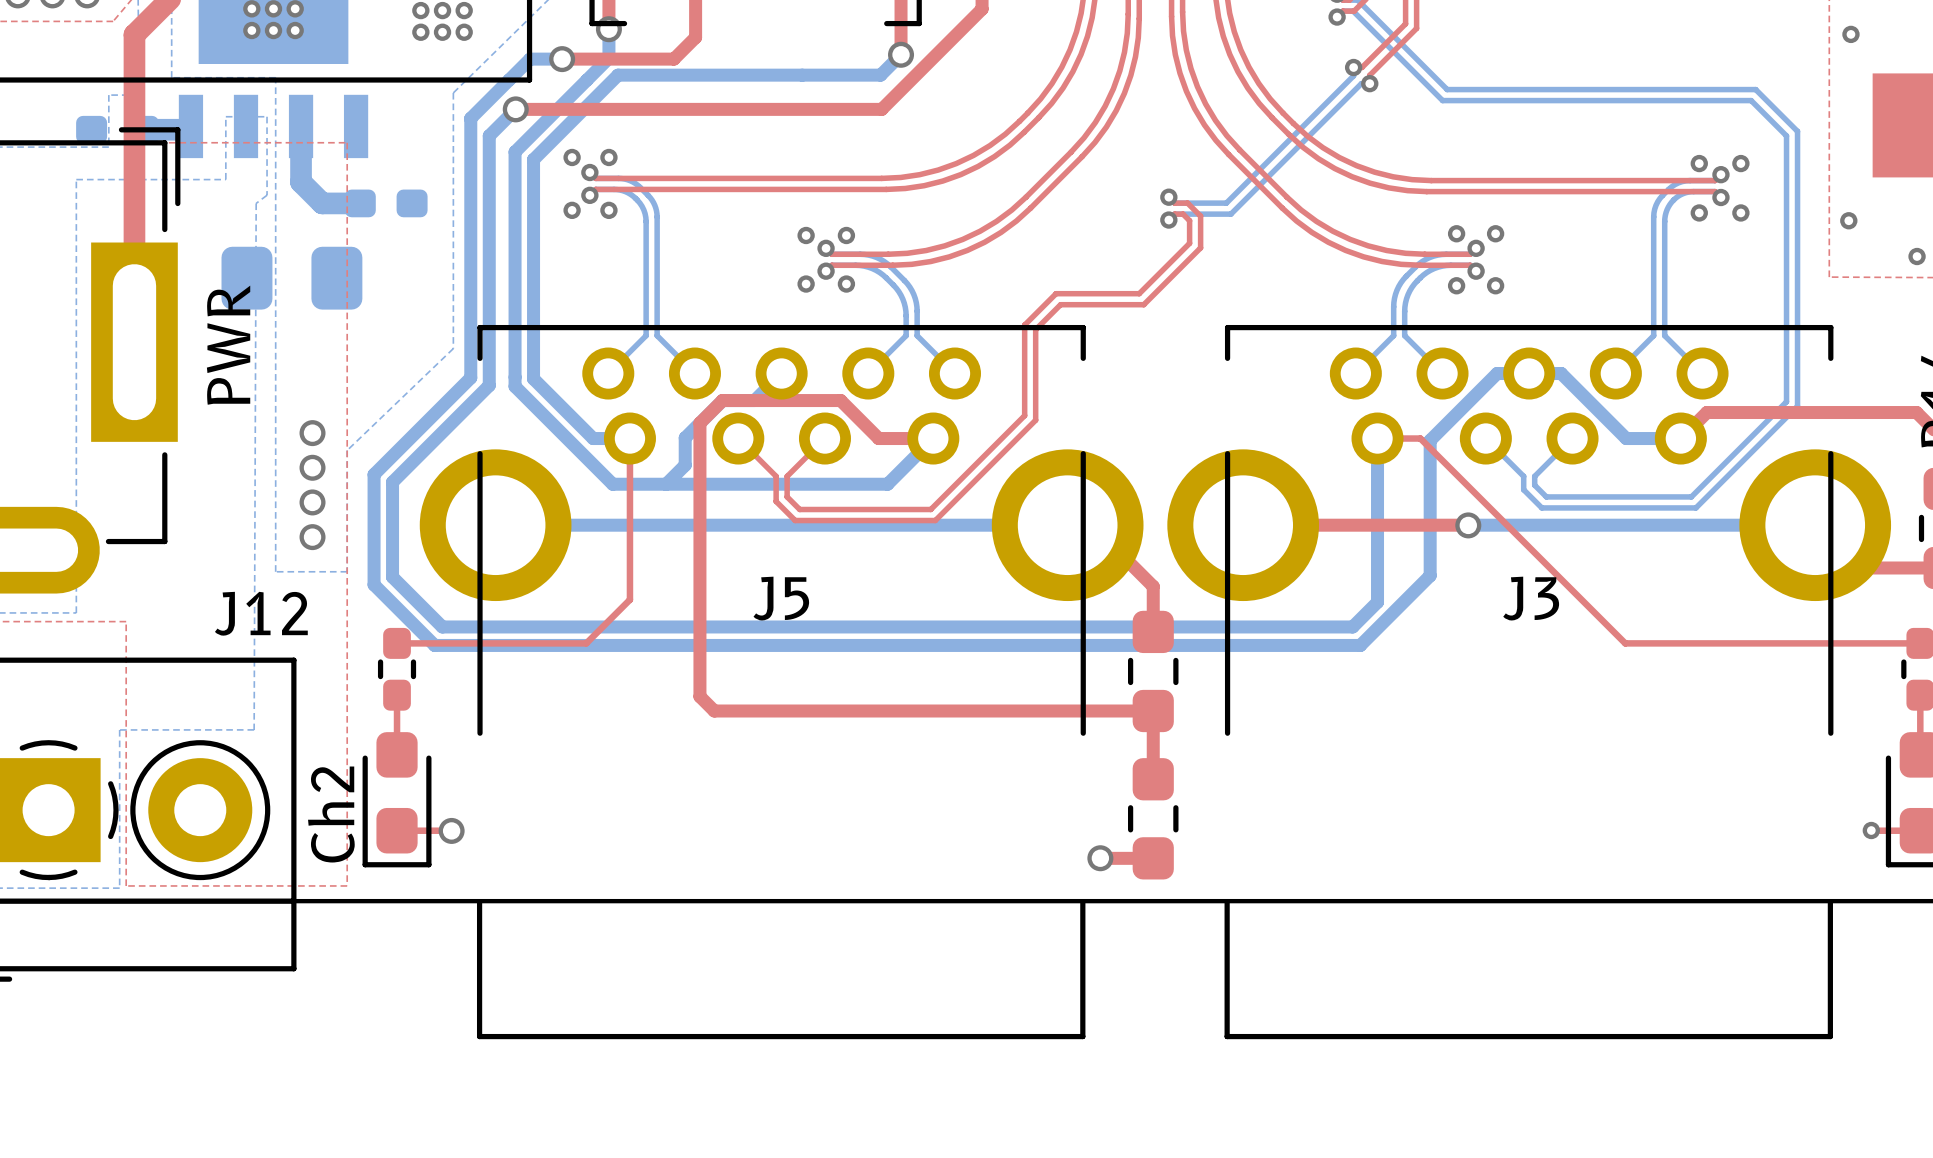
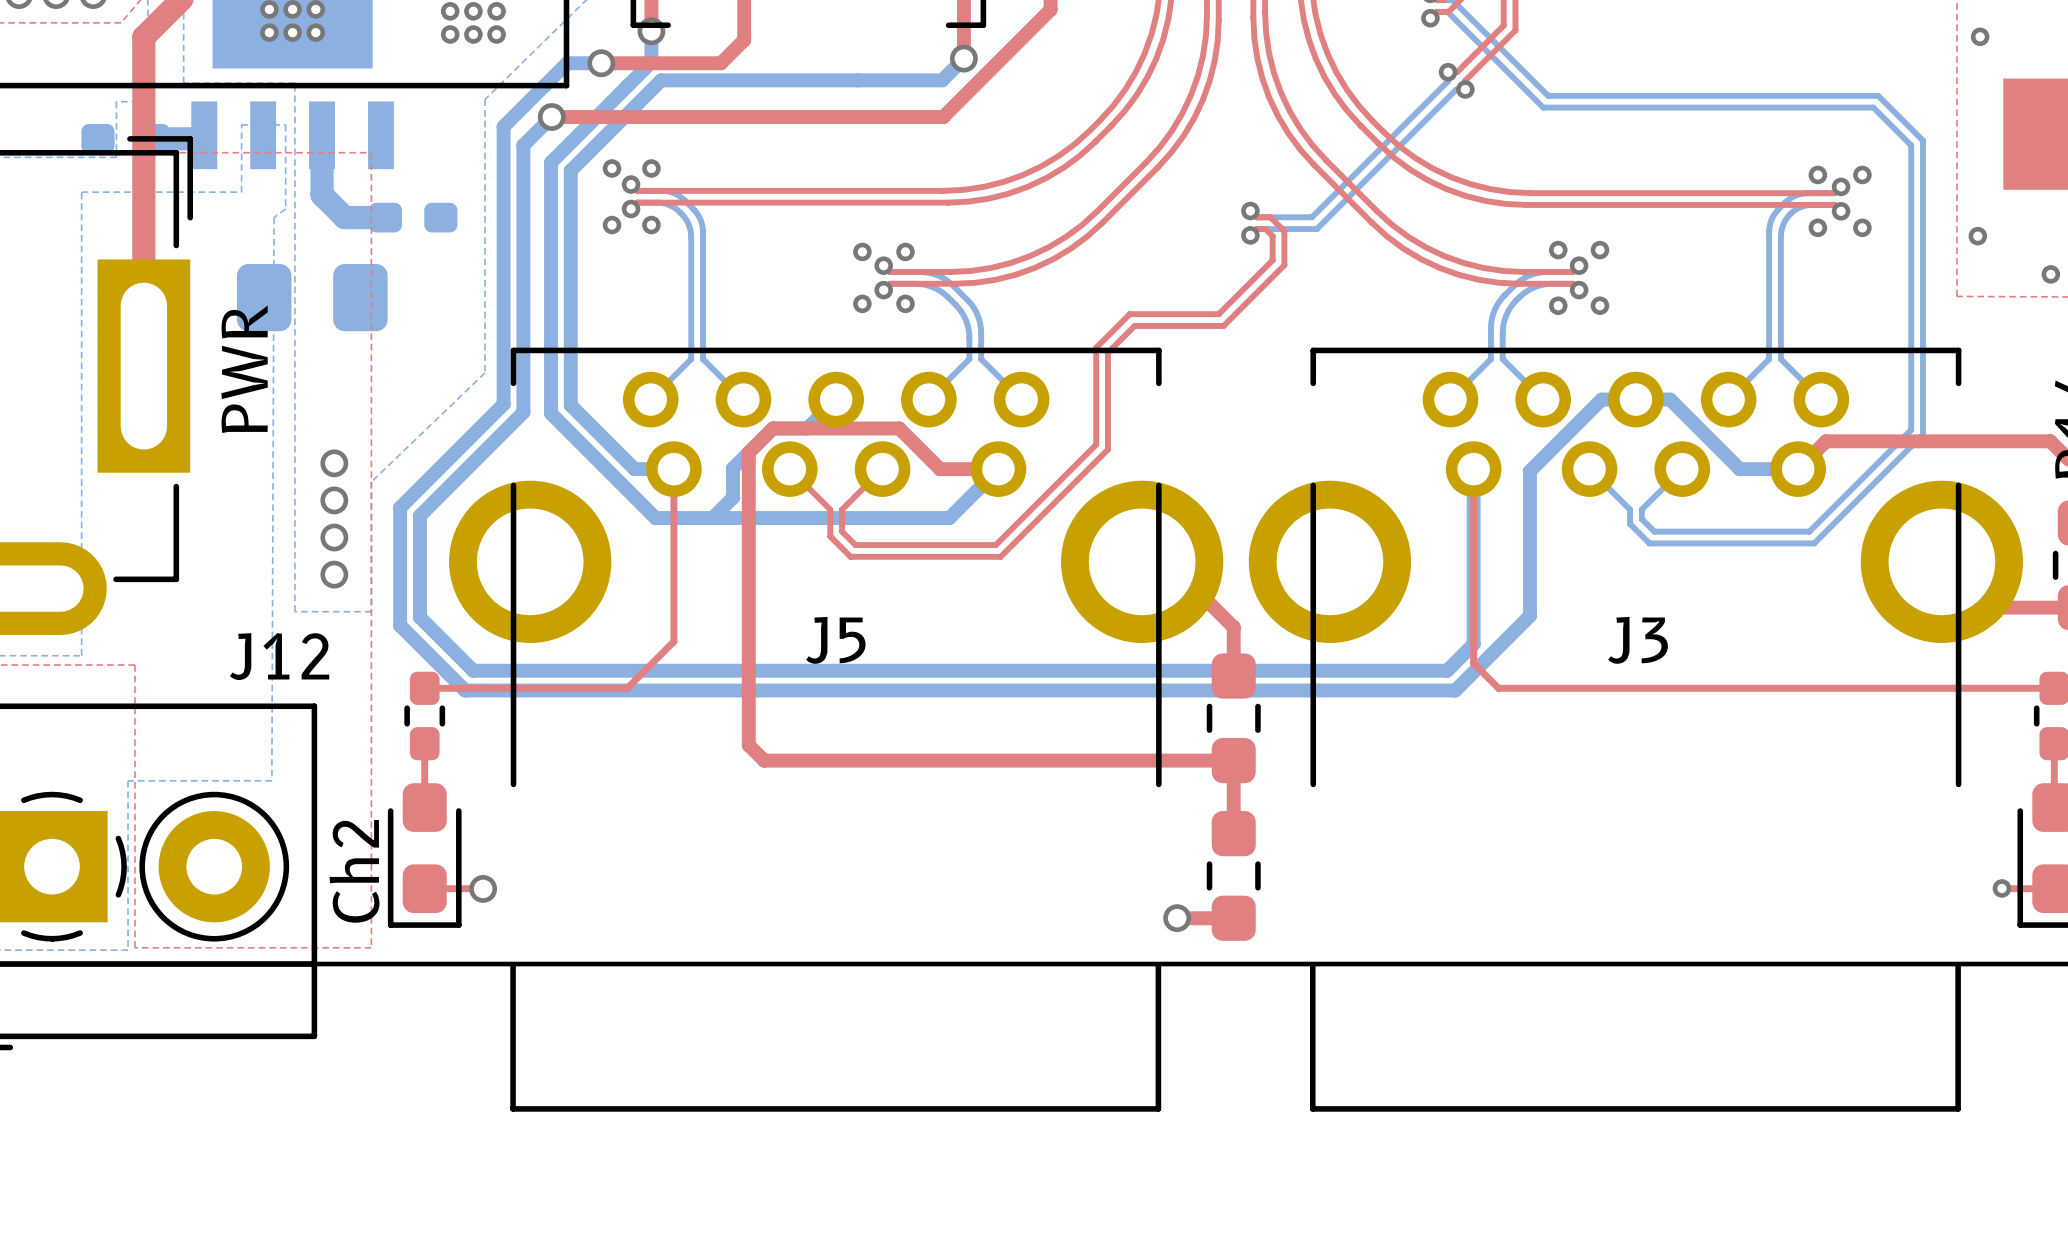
top track: (1377, 438) (1420, 438) (1625, 643) -> (1473, 469) (1473, 663) (1498, 688) (1738, 688)
bottom track: (495, 525) (1067, 525) -> none
top track: (1243, 525) (1468, 525) -> none
bottom track: (1468, 525) (1815, 525) -> none
via: (1468, 525) -> none

